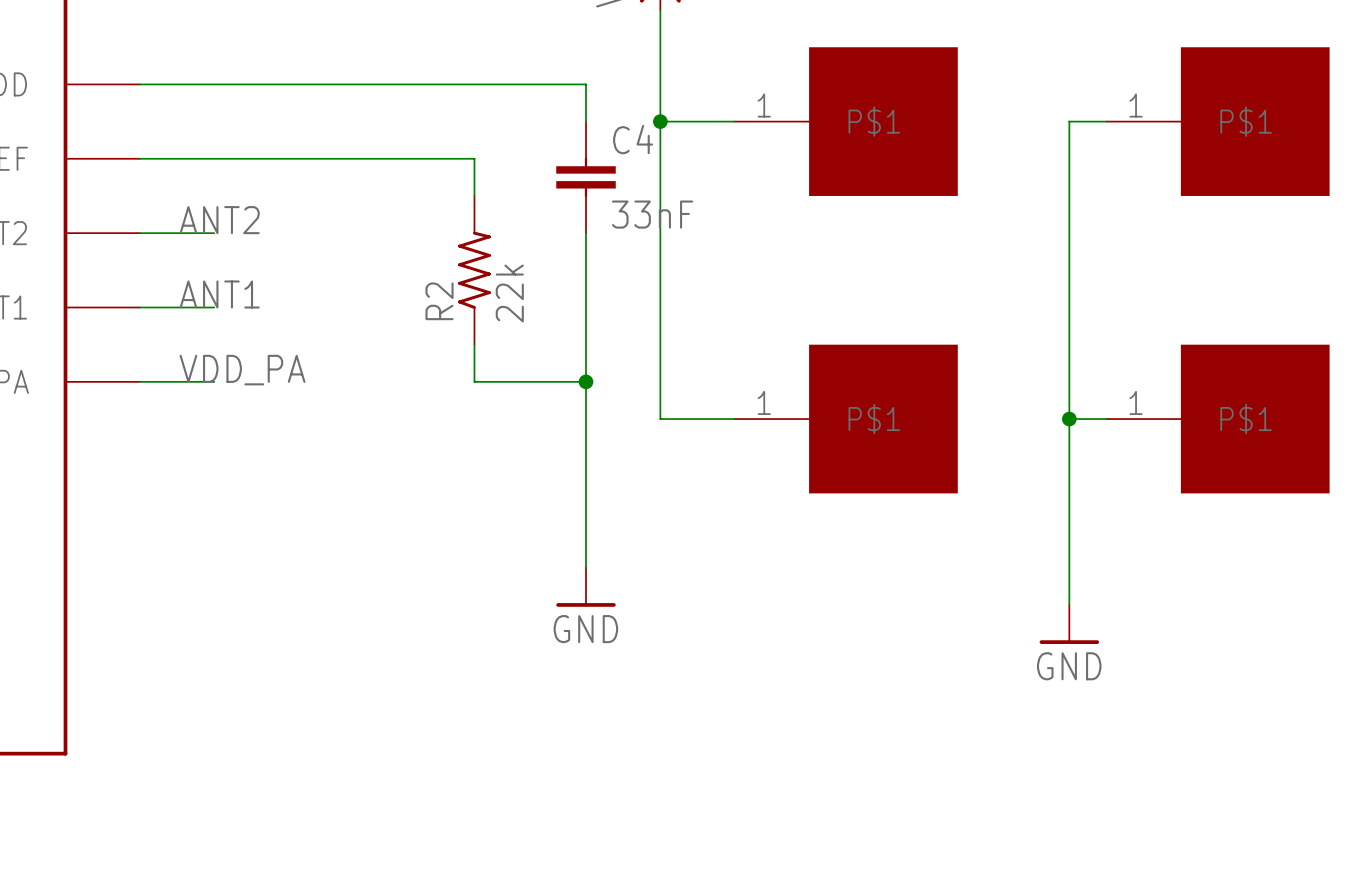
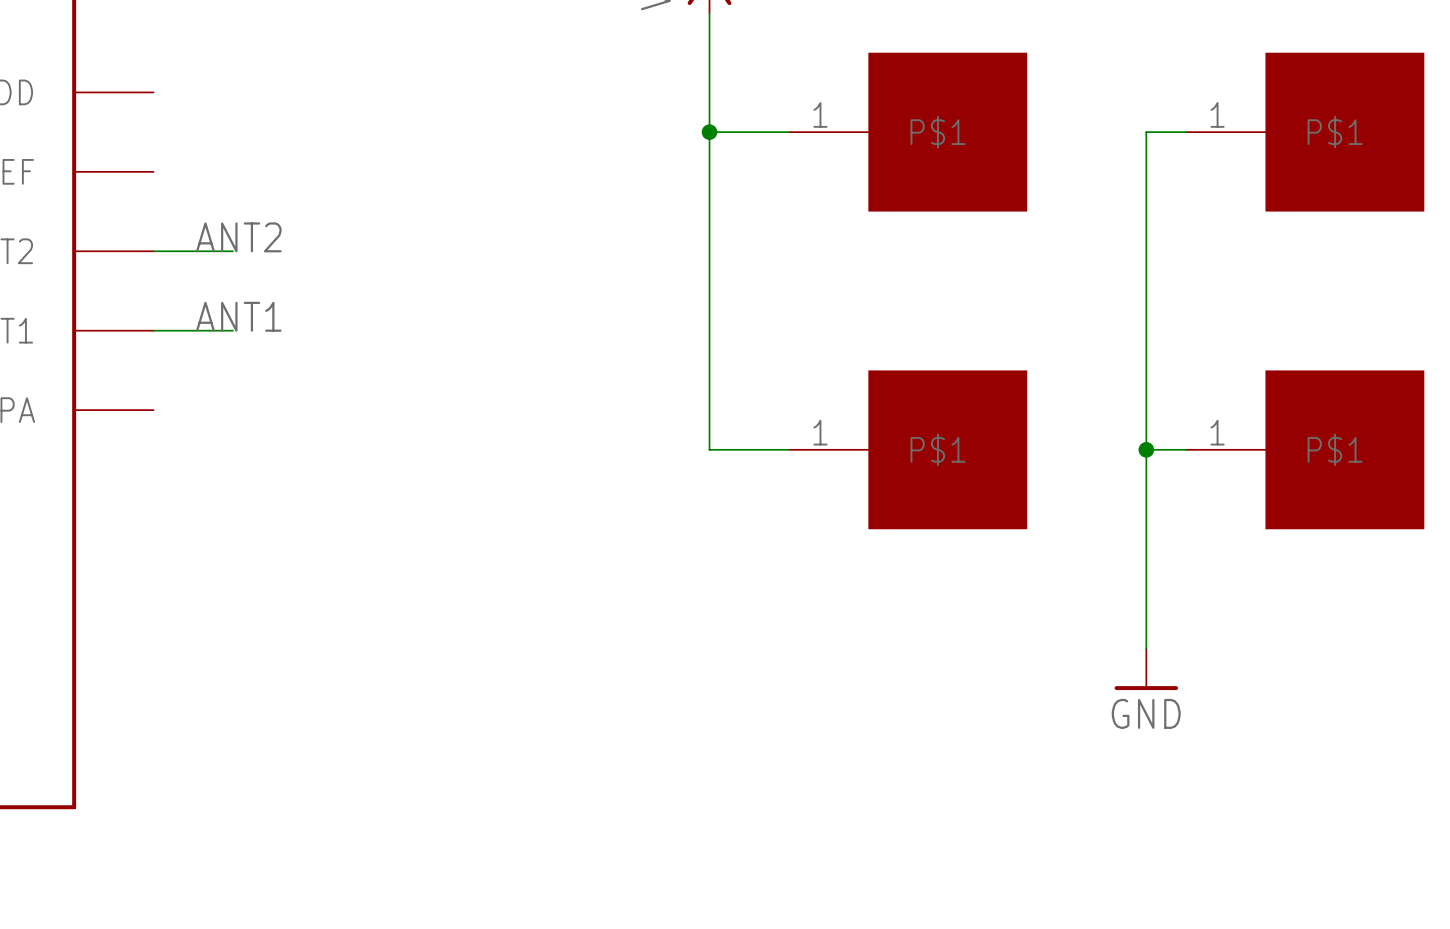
wire: (139, 84) (586, 84) (586, 121) -> none
wire: (139, 158) (474, 158) (474, 195) -> none
C4: 33nF (586, 177) -> none
wire: (586, 233) (586, 567) -> none
R2: 22k (474, 270) -> none
wire: (474, 344) (474, 381) (586, 381) -> none
label: VDD_PA (242, 370) -> none
wire: (139, 381) (214, 381) -> none
junction: (586, 381) -> none
power symbol: GND (586, 587) -> none

